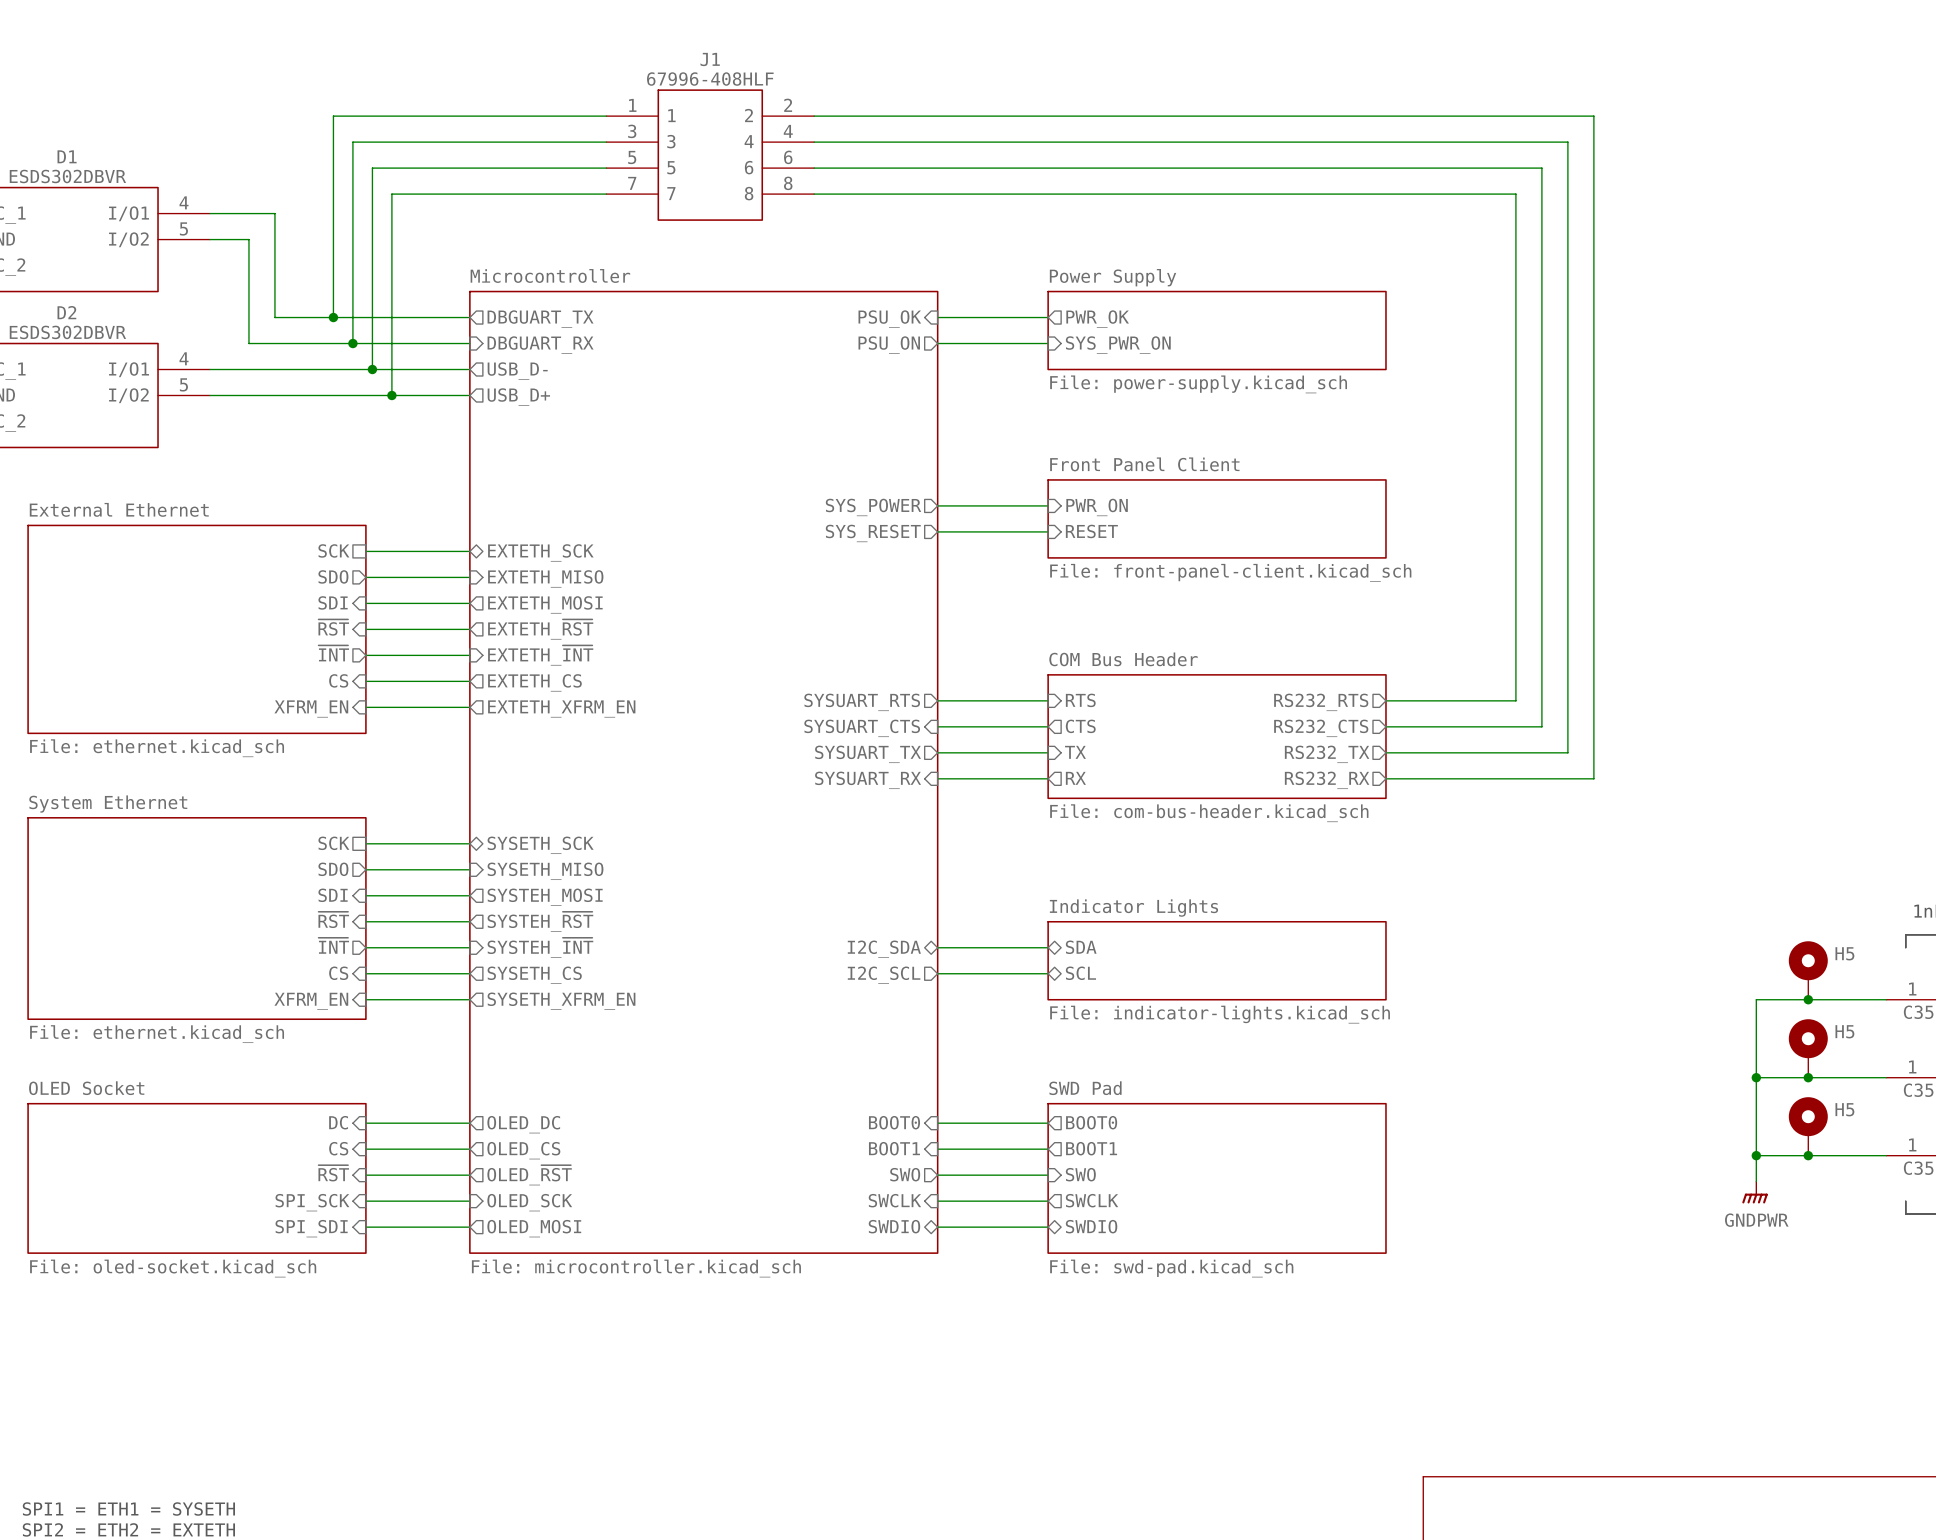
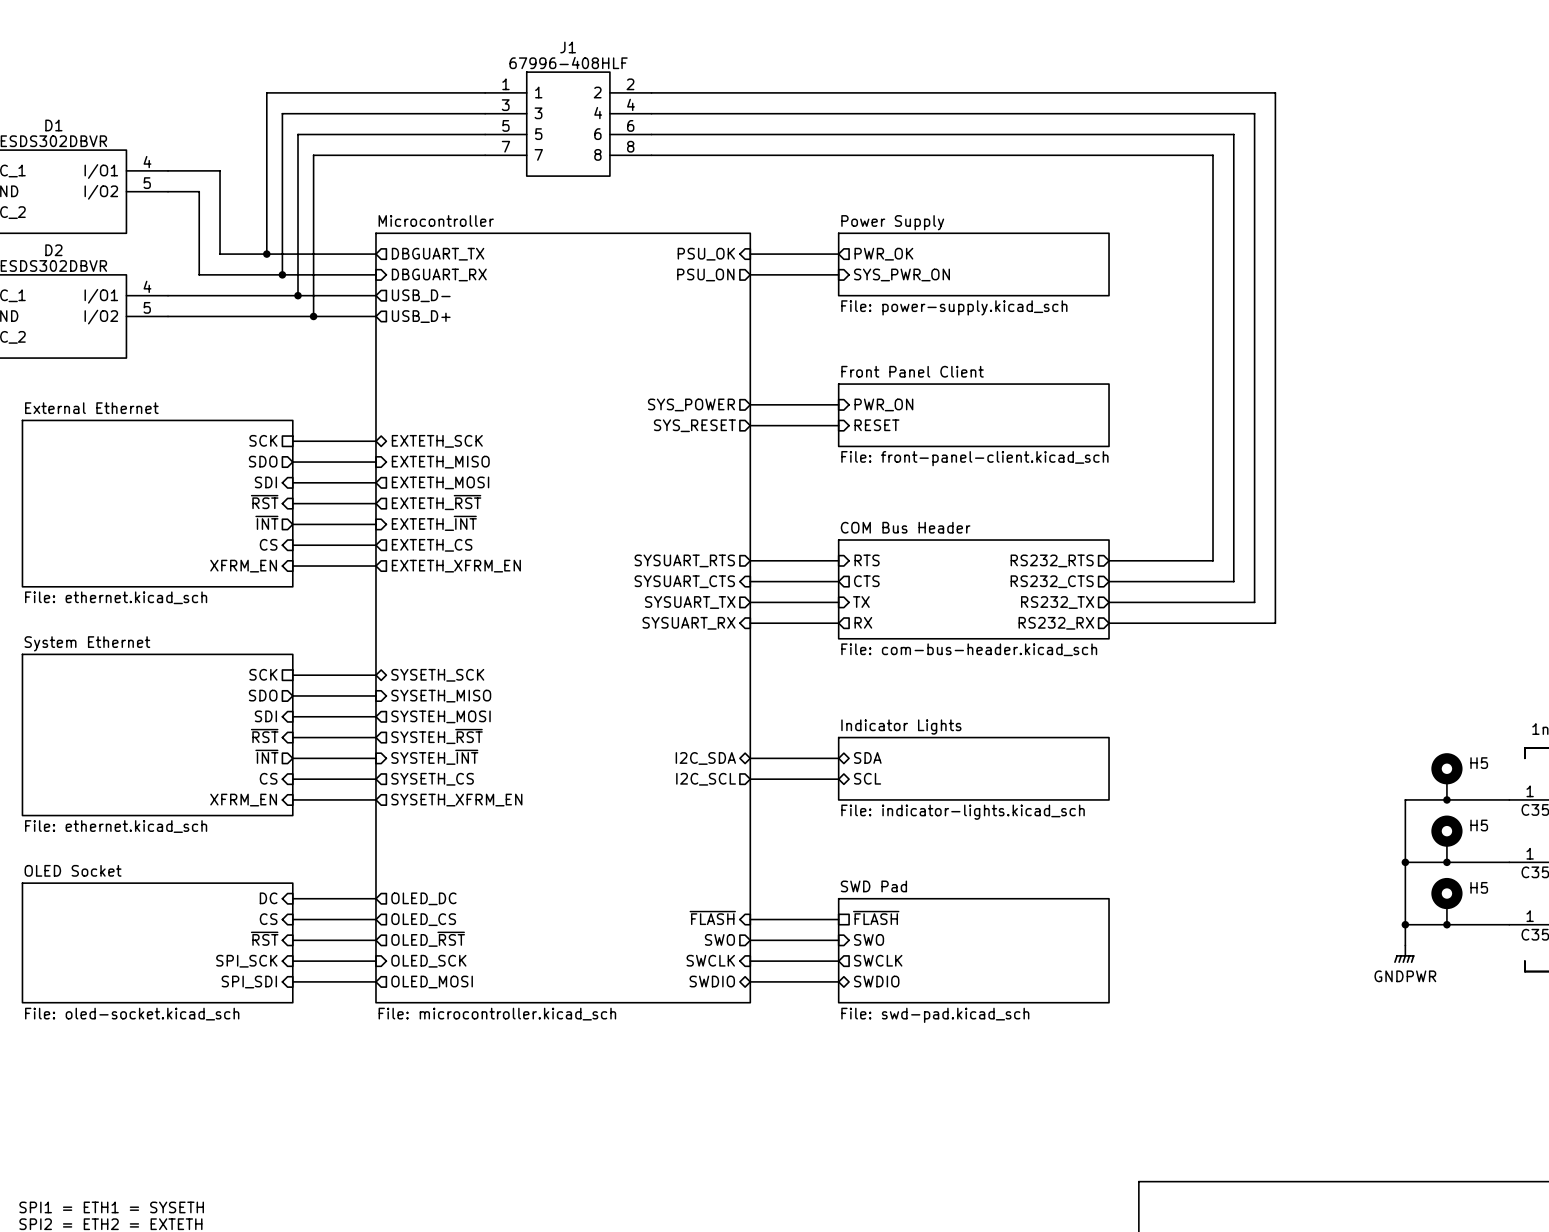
sheet SWD Pad shape: [1047, 1102, 1387, 1254] -> [838, 898, 1110, 1004]
sheet pin: BOOT0 (894, 1122) -> none
sheet pin: BOOT0 (1091, 1122) -> none
wire: (937, 1123) (1048, 1123) -> none
sheet pin: BOOT1 (894, 1148) -> ~{FLASH} (712, 917)
sheet pin shape: output (1091, 1148) -> passive (876, 917)
sheet pin: BOOT1 (1091, 1148) -> ~{FLASH} (876, 917)

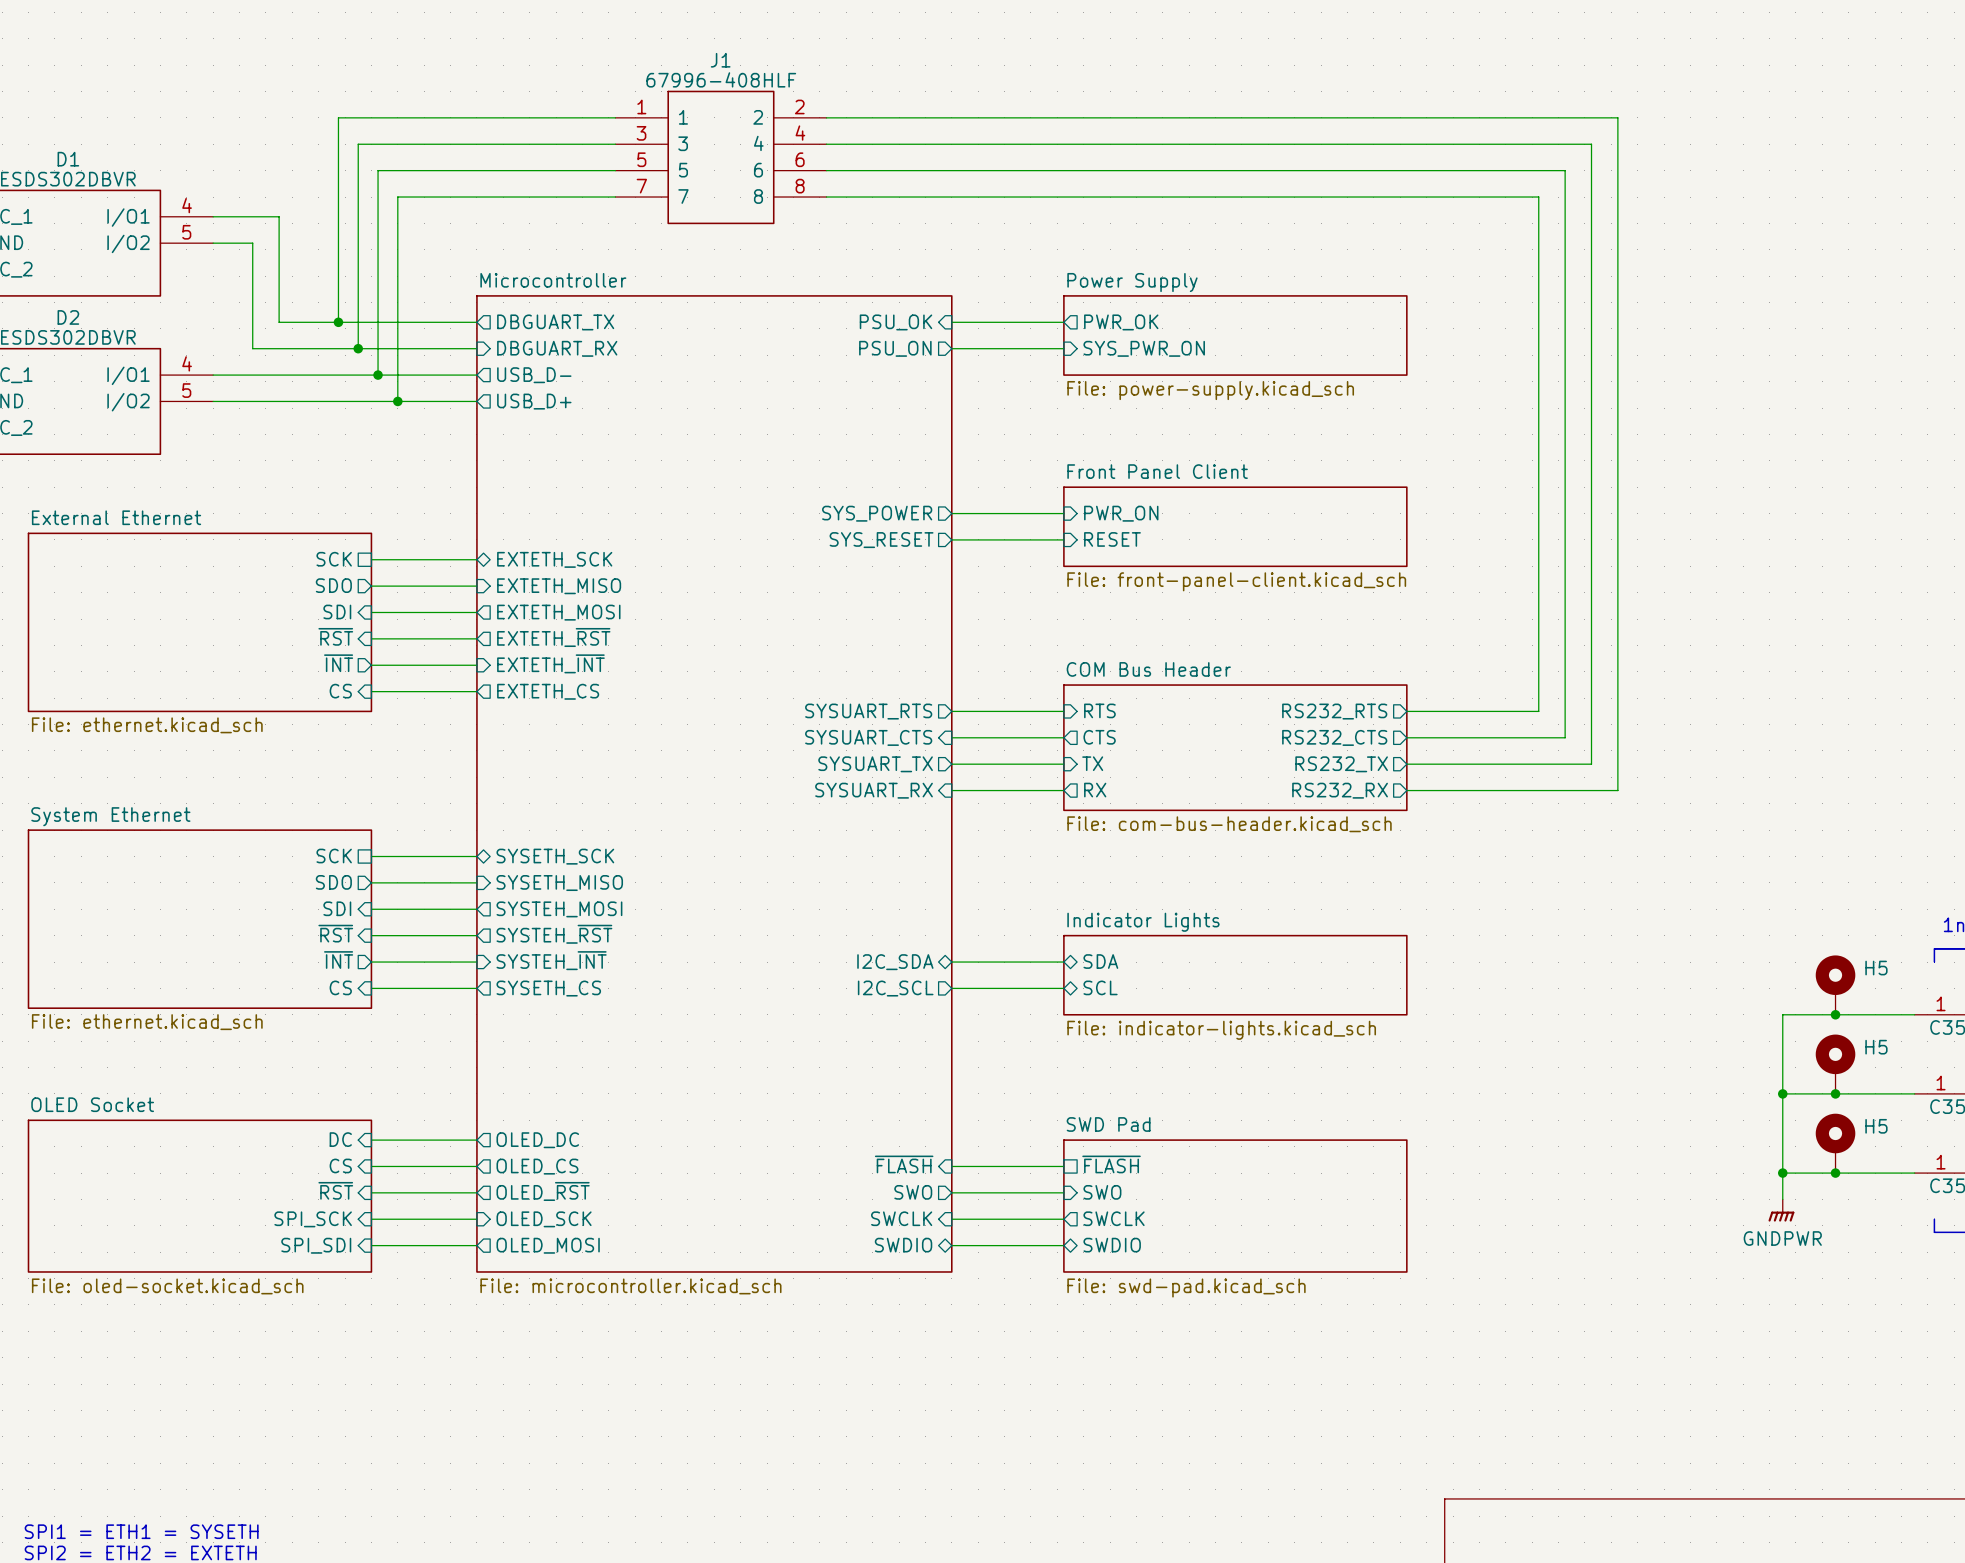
sheet External Ethernet: none -> File: ethernet.kicad_sch (199, 622)
sheet External Ethernet: File: ethernet.kicad_sch (157, 503) -> none
sheet pin: XFRM_EN (243, 566) -> none
wire: (292, 566) (375, 566) -> none
sheet pin: EXTETH_XFRM_EN (456, 566) -> none
sheet System Ethernet: none -> File: ethernet.kicad_sch (199, 919)
sheet System Ethernet: File: ethernet.kicad_sch (157, 734) -> none
wire: (292, 799) (375, 799) -> none
sheet pin: XFRM_EN (243, 800) -> none
sheet pin: SYSETH_XFRM_EN (456, 800) -> none

